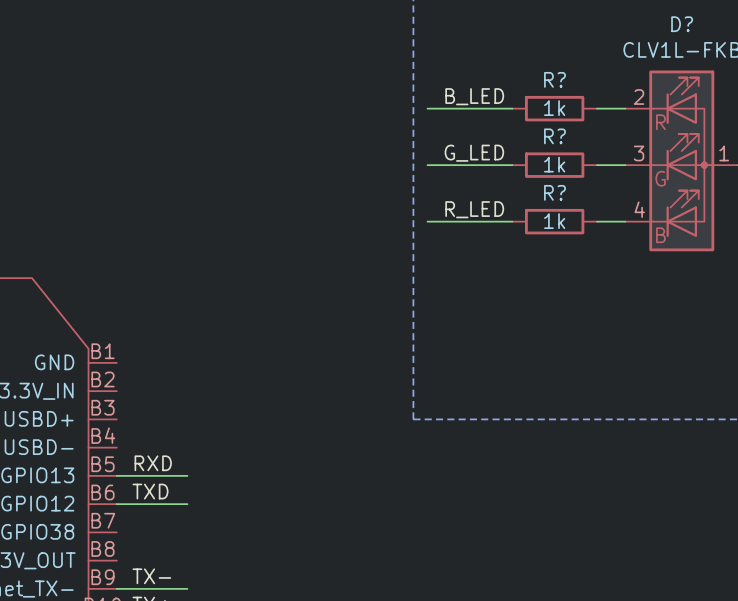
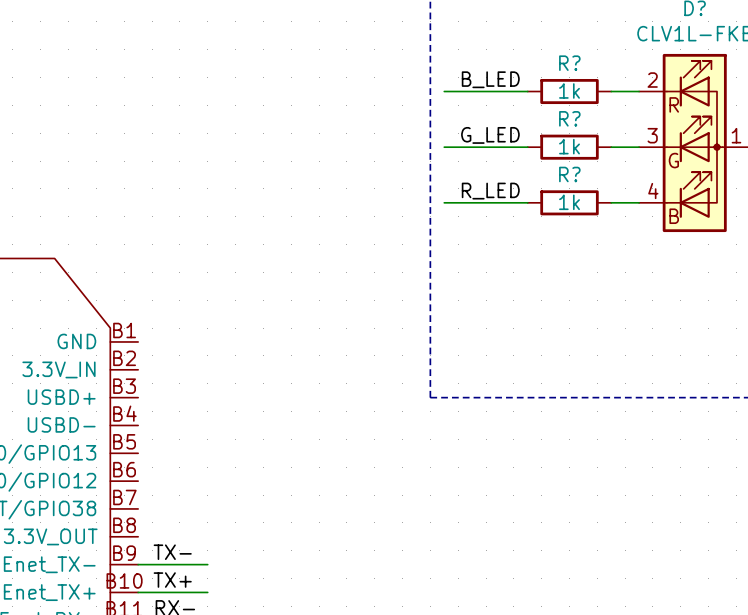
label: RXD (153, 463) -> none
wire: (116, 475) (187, 475) -> none
label: TXD (150, 491) -> none
wire: (116, 504) (187, 504) -> none

